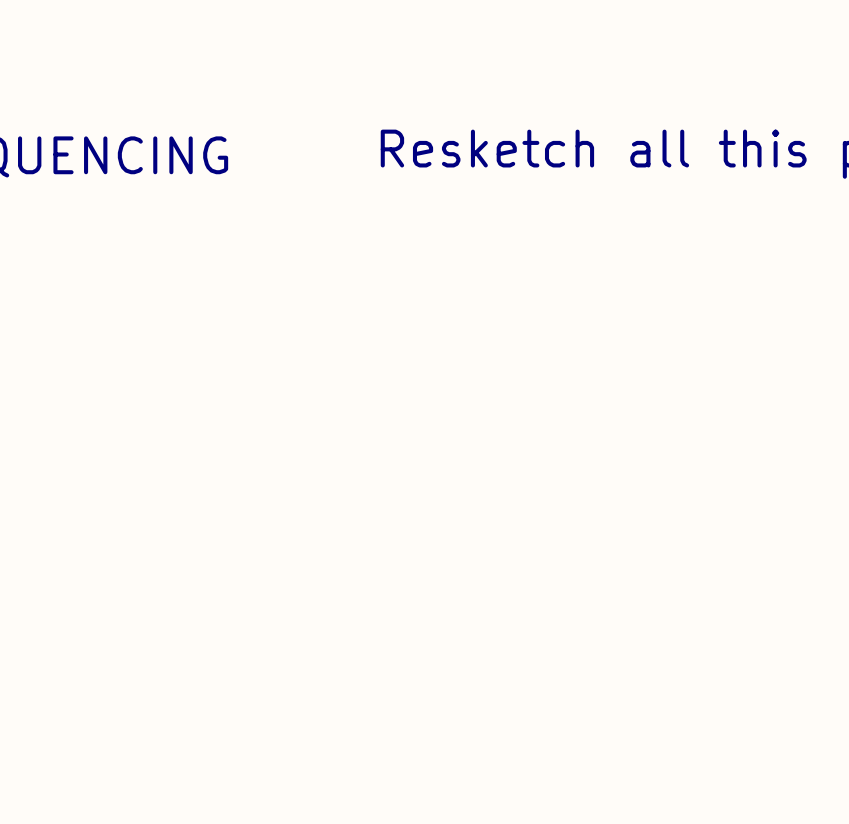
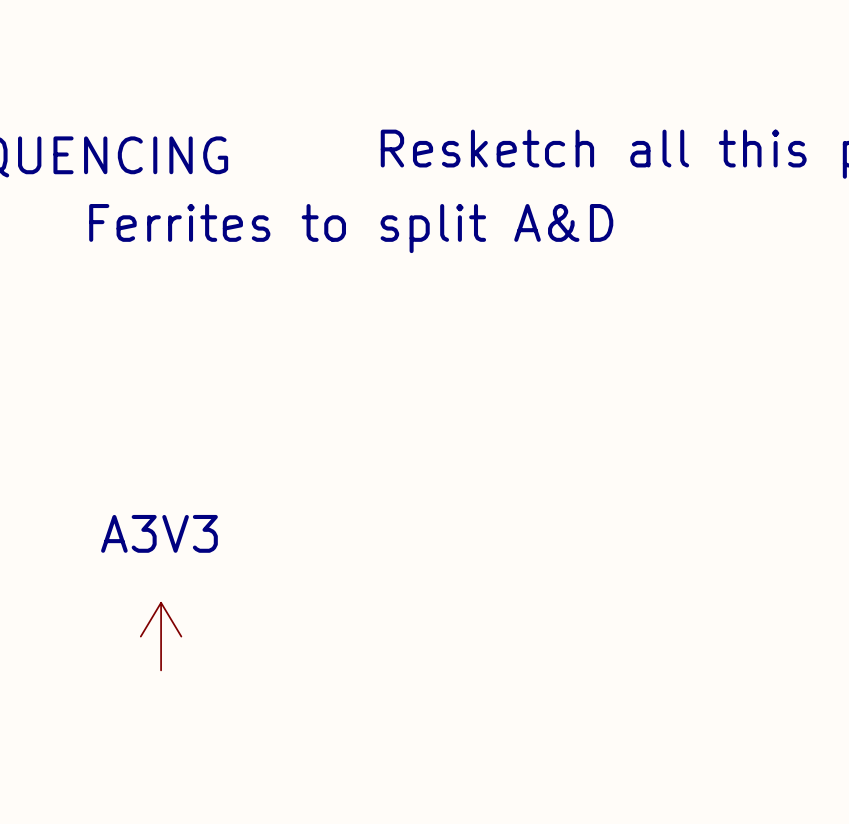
text: none -> Ferrites to split A&D (351, 228)
power symbol: none -> A3V3 (161, 636)

